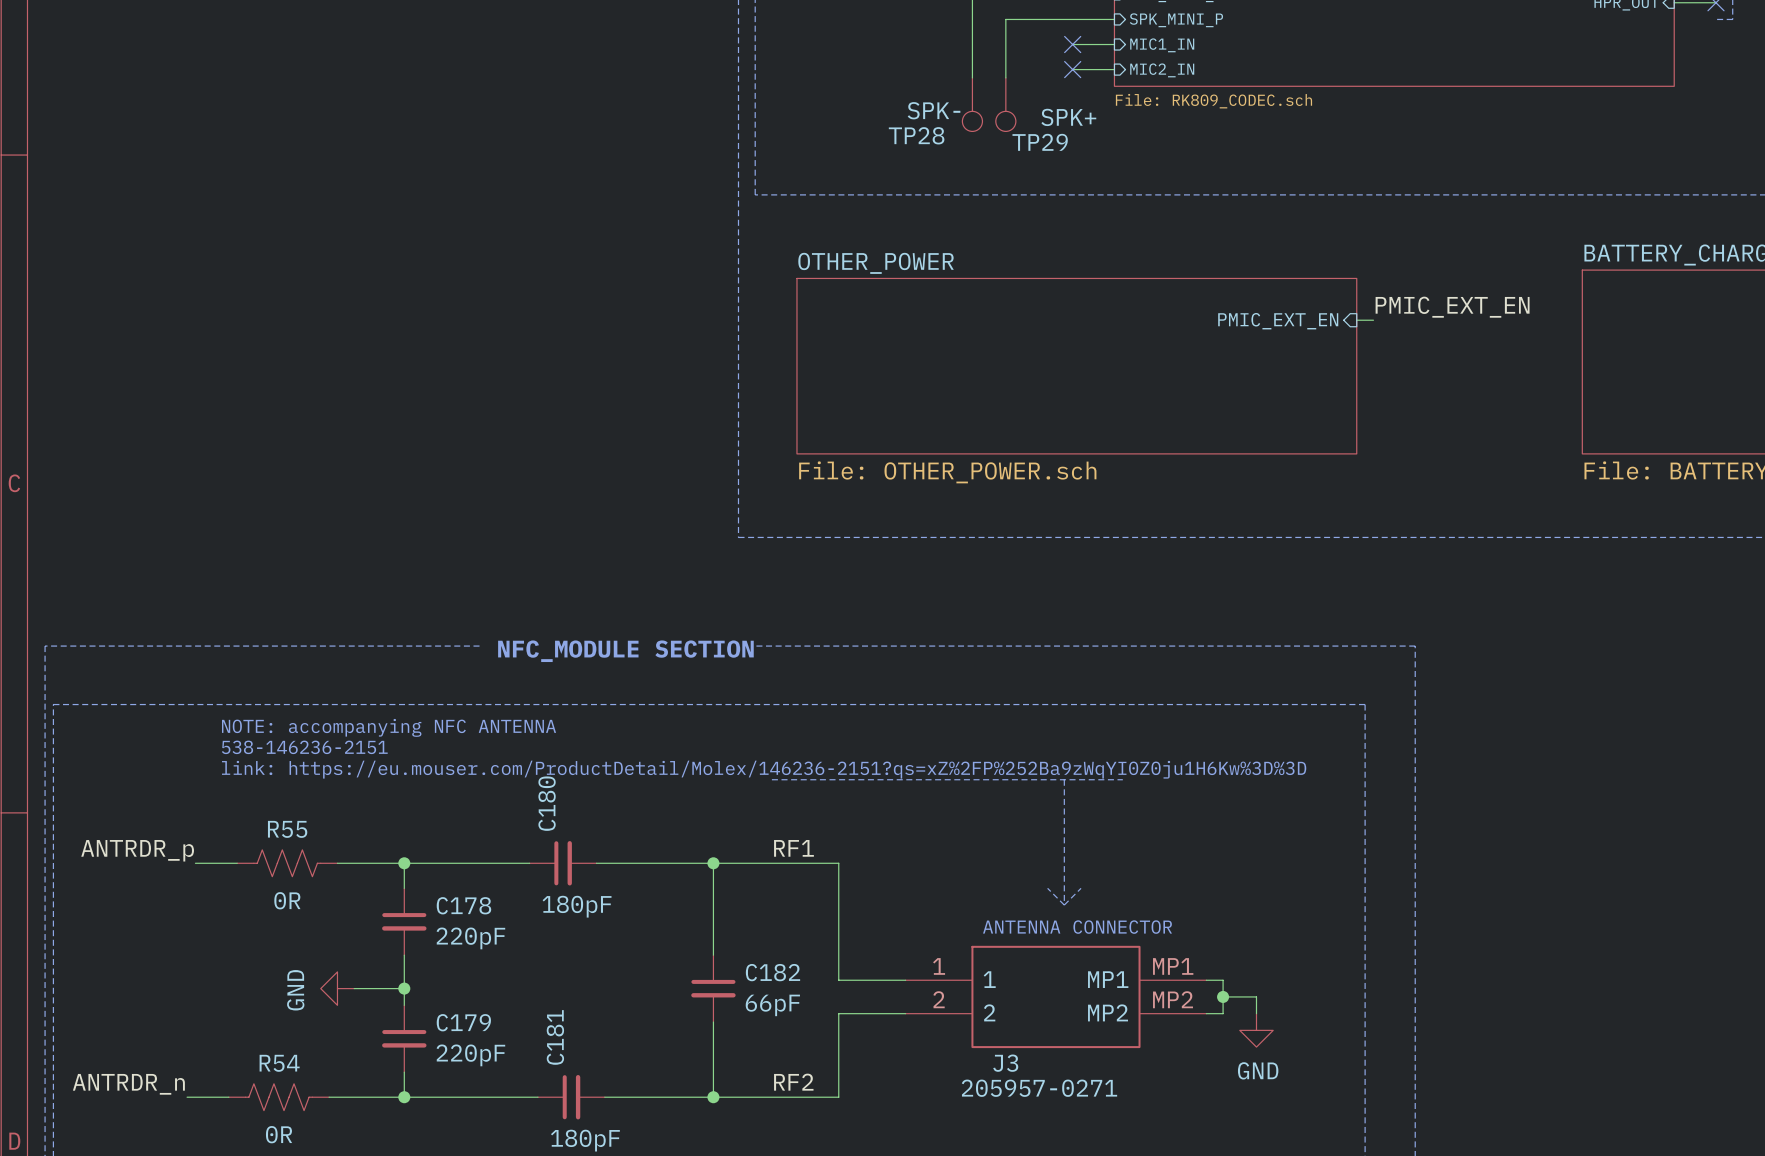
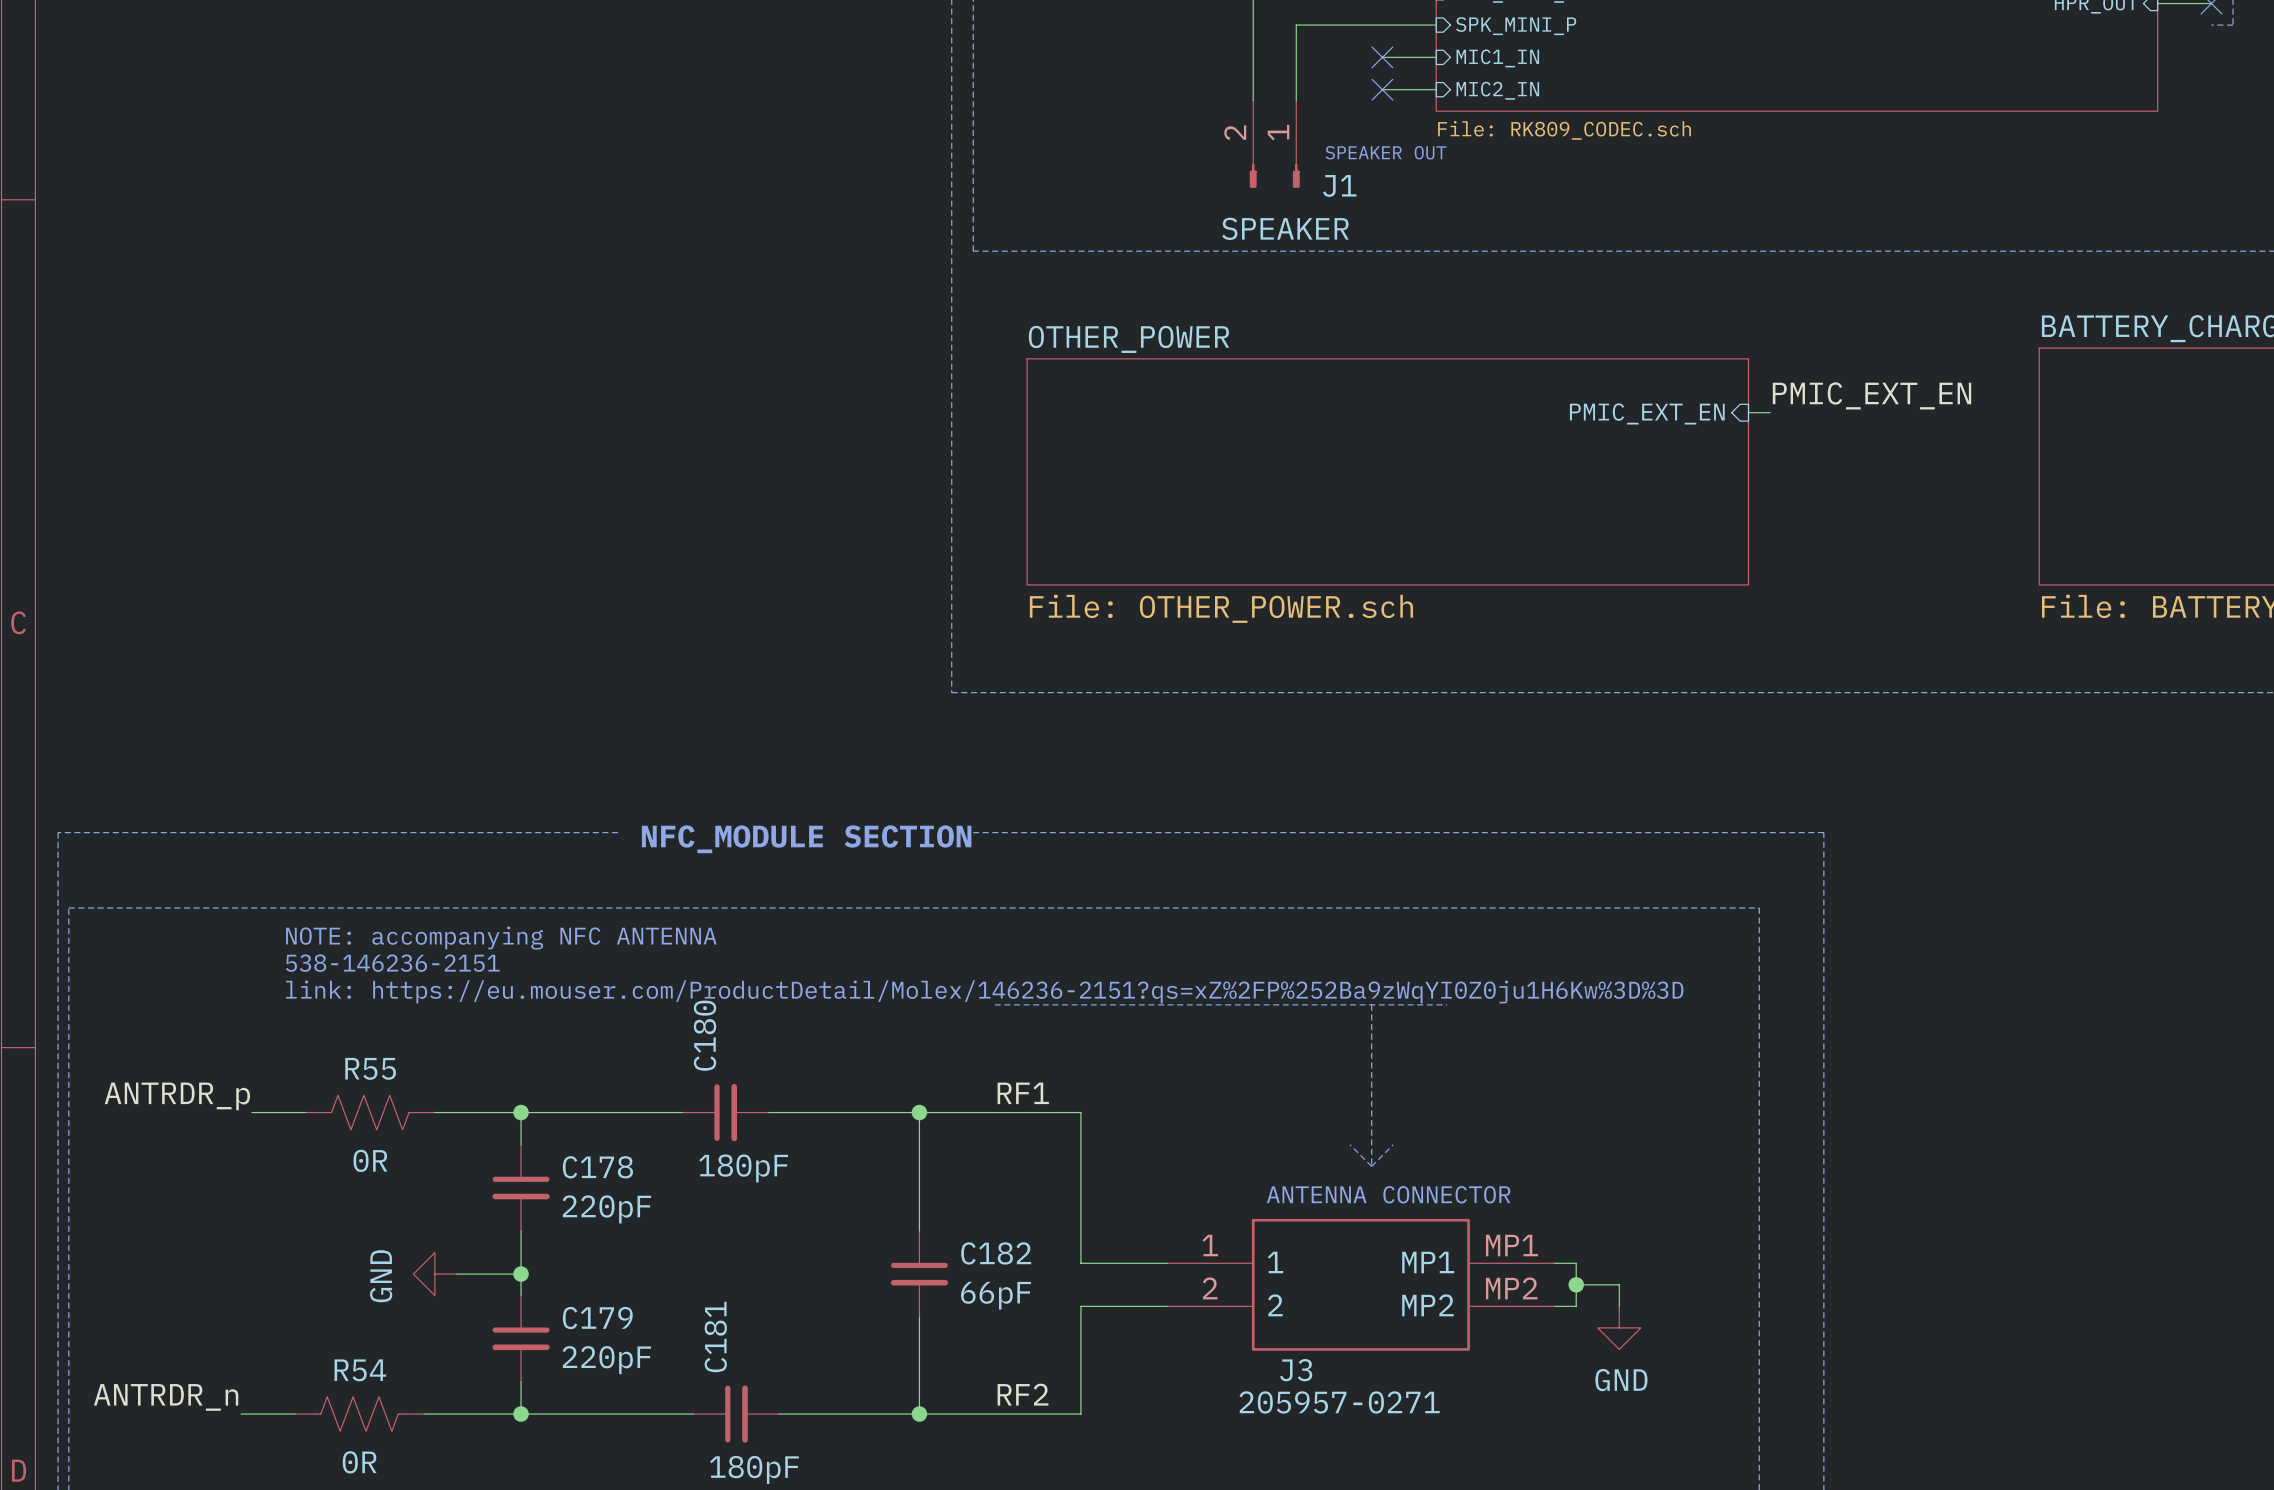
TP28: SPK- (972, 104) -> none
TP29: SPK+ (1005, 104) -> none
J1: none -> SPEAKER (1274, 144)
text: none -> SPEAKER OUT (1386, 152)

